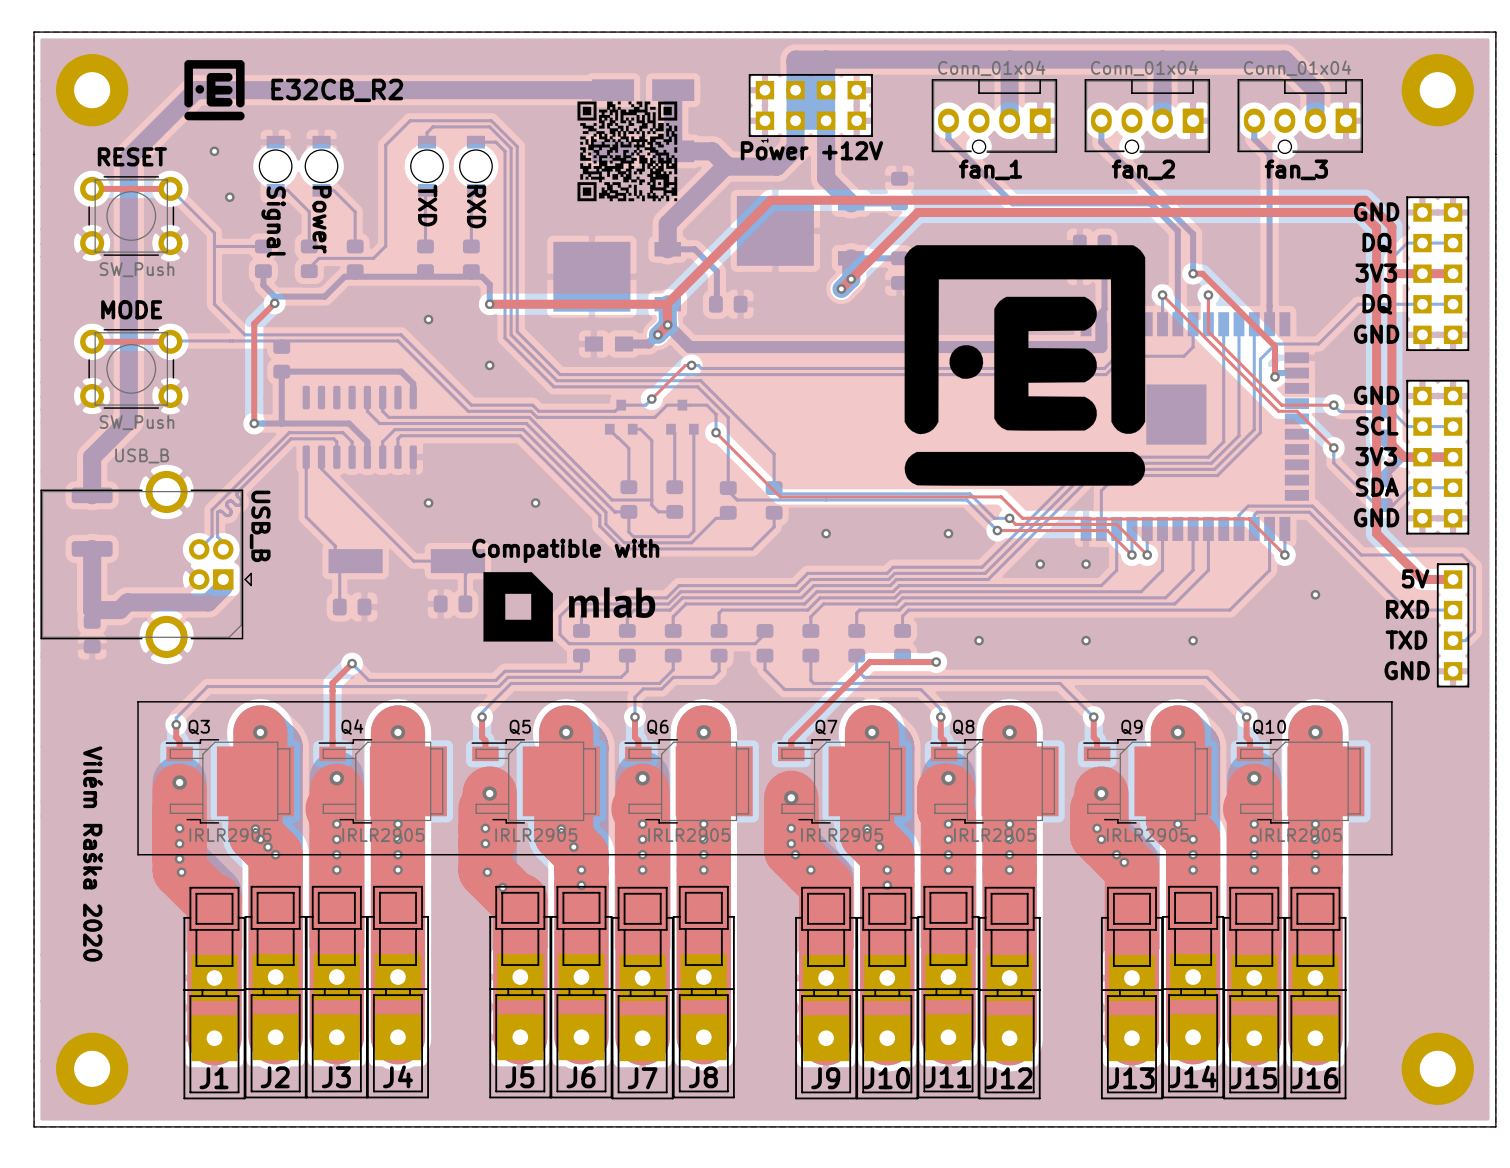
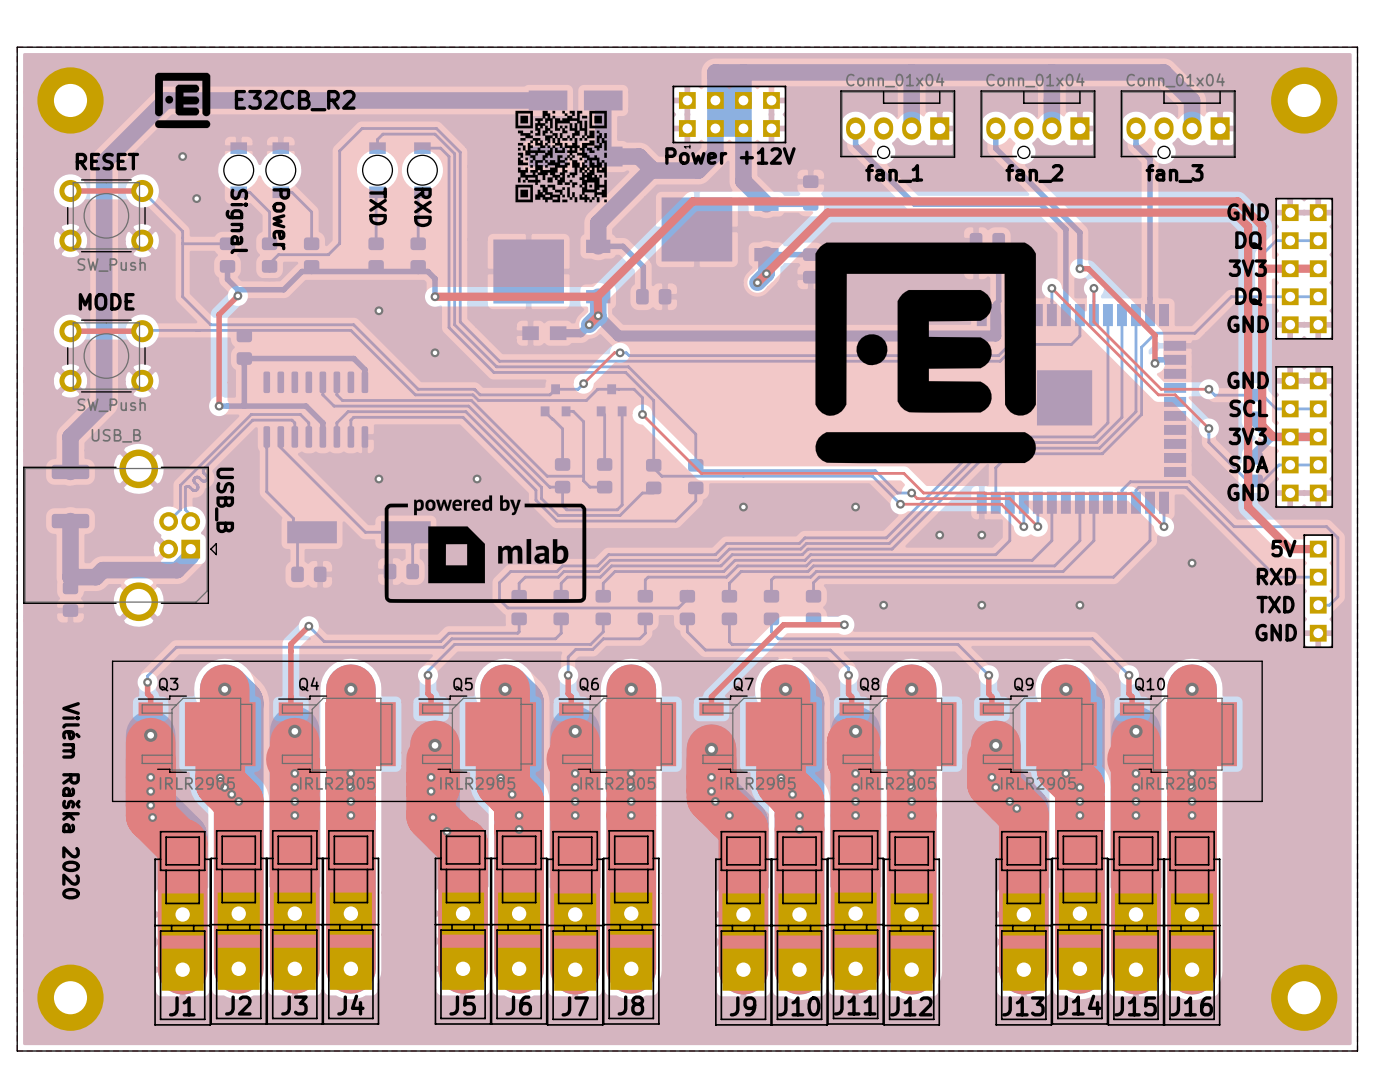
drawing: none -> [384, 495, 587, 603]
text: Compatible with (565, 550) -> none
drawing: [483, 572, 656, 642] -> none

